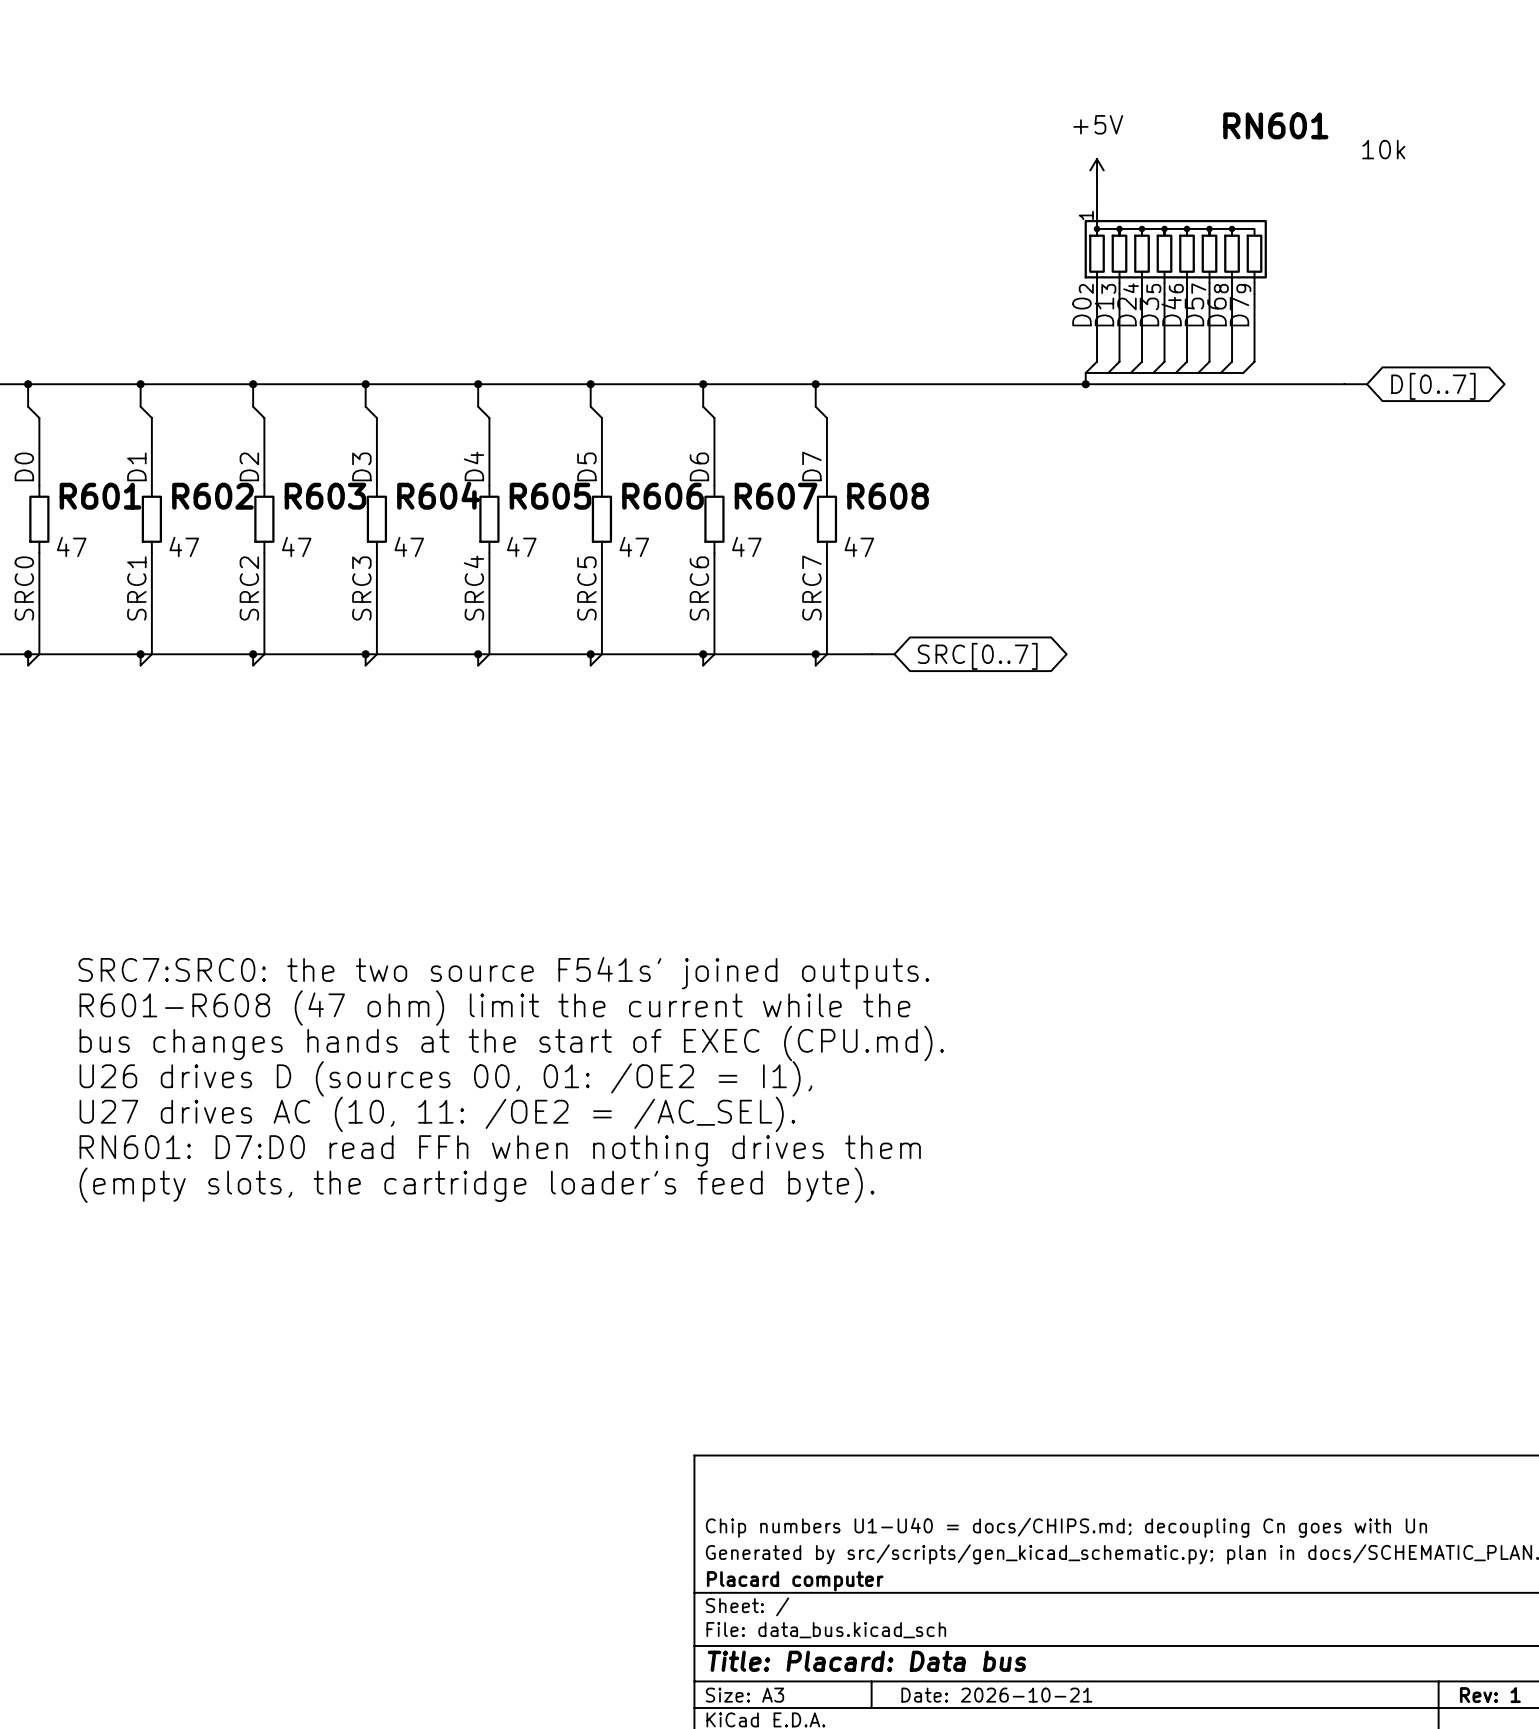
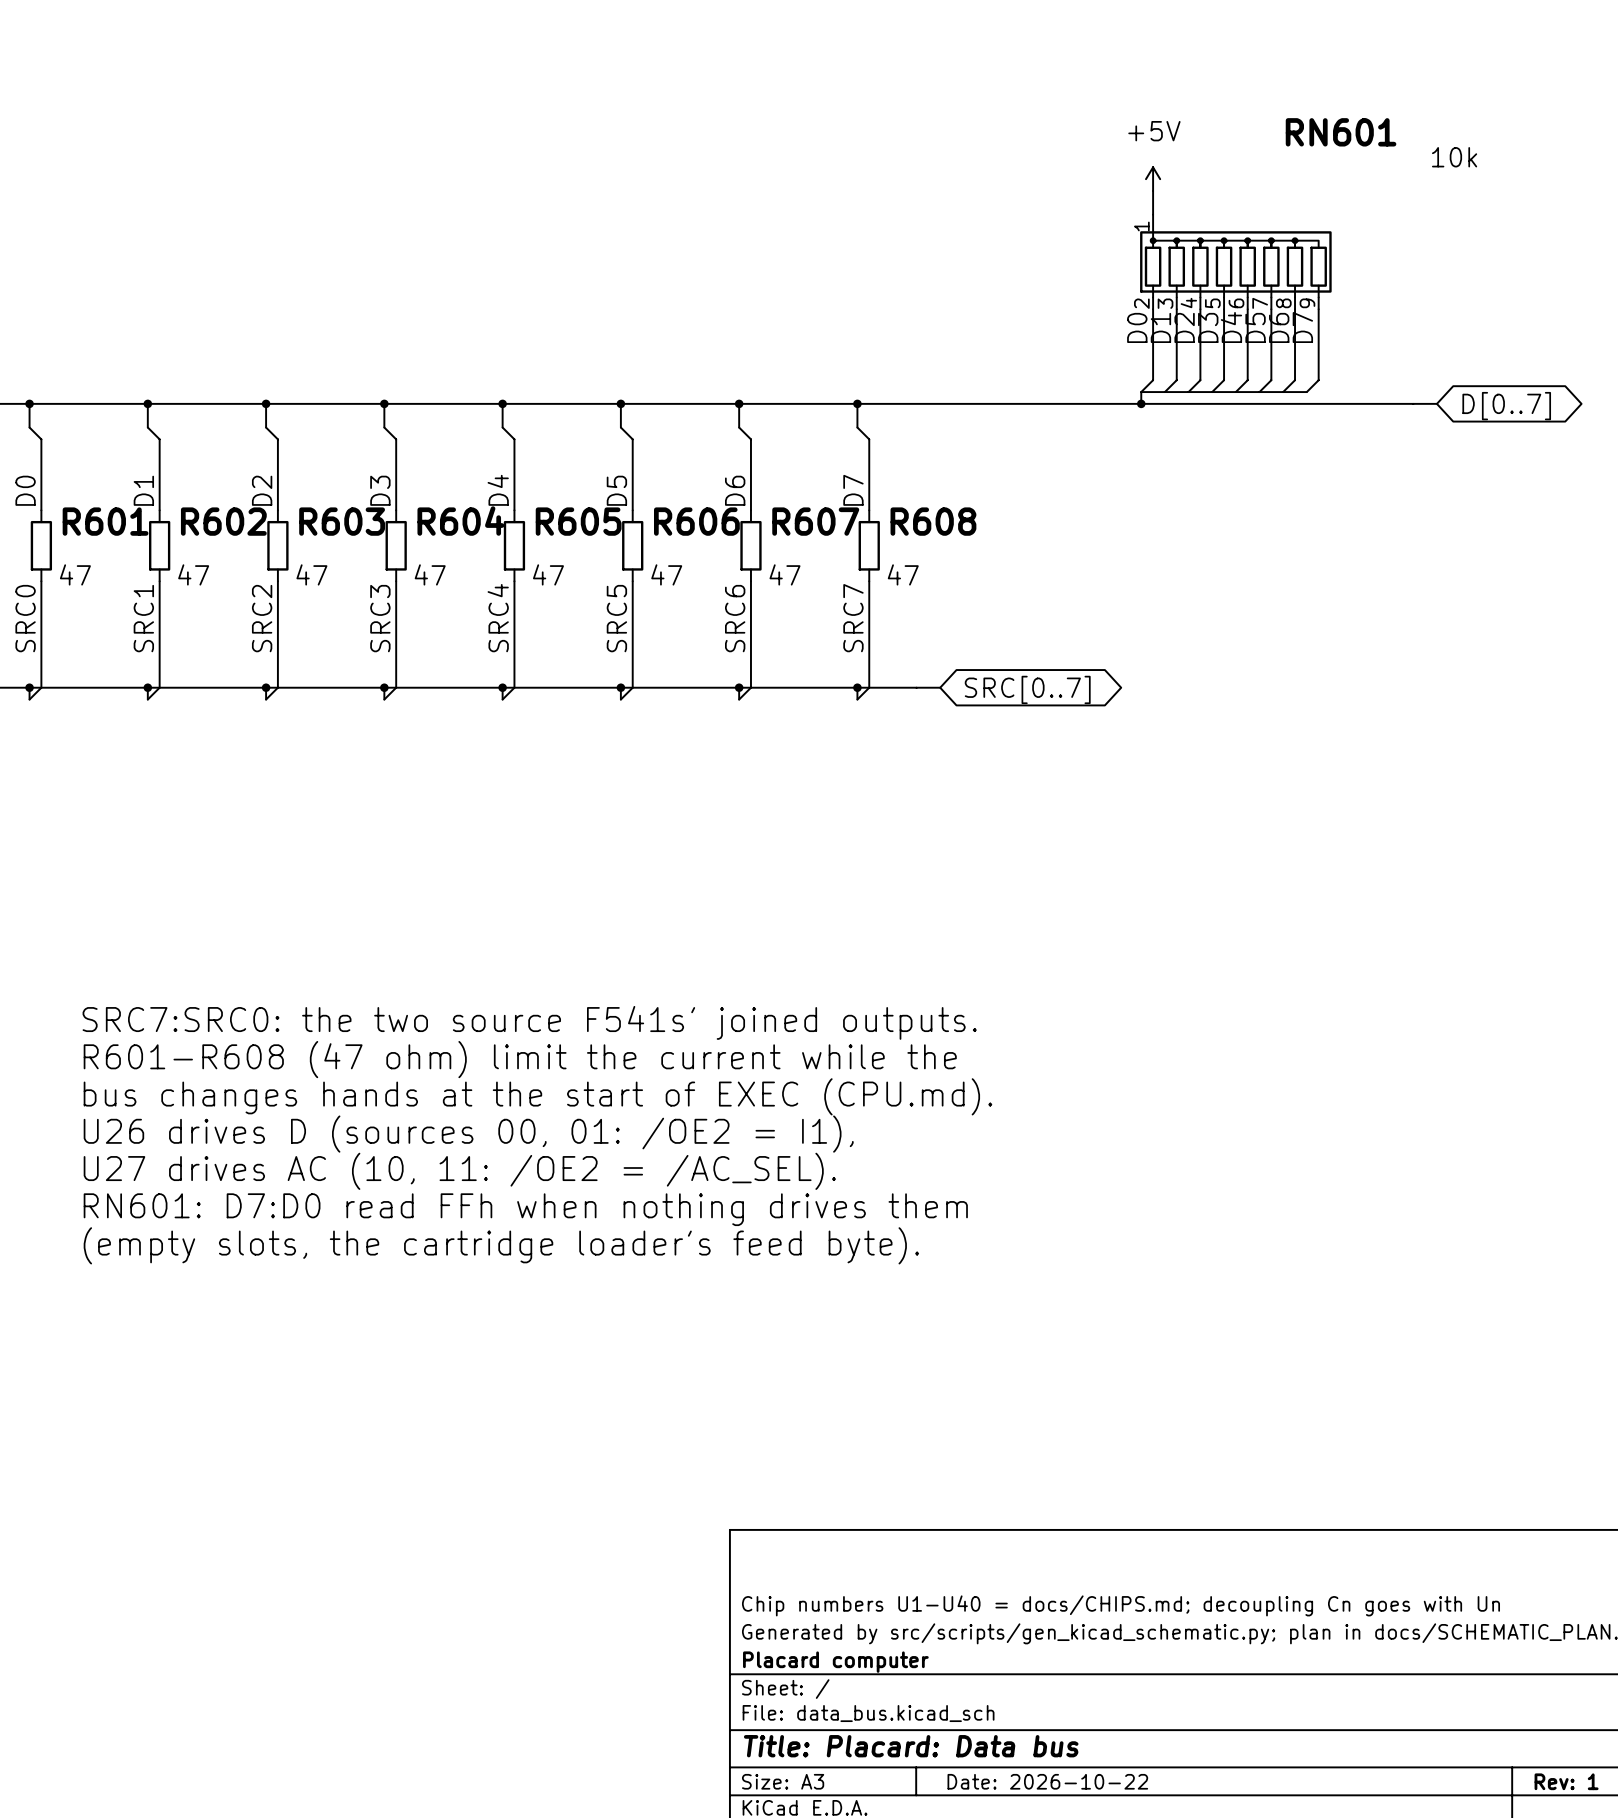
title block: Date: 2026-10-21 (996, 1695) -> Date: 2026-10-22 (1047, 1781)

